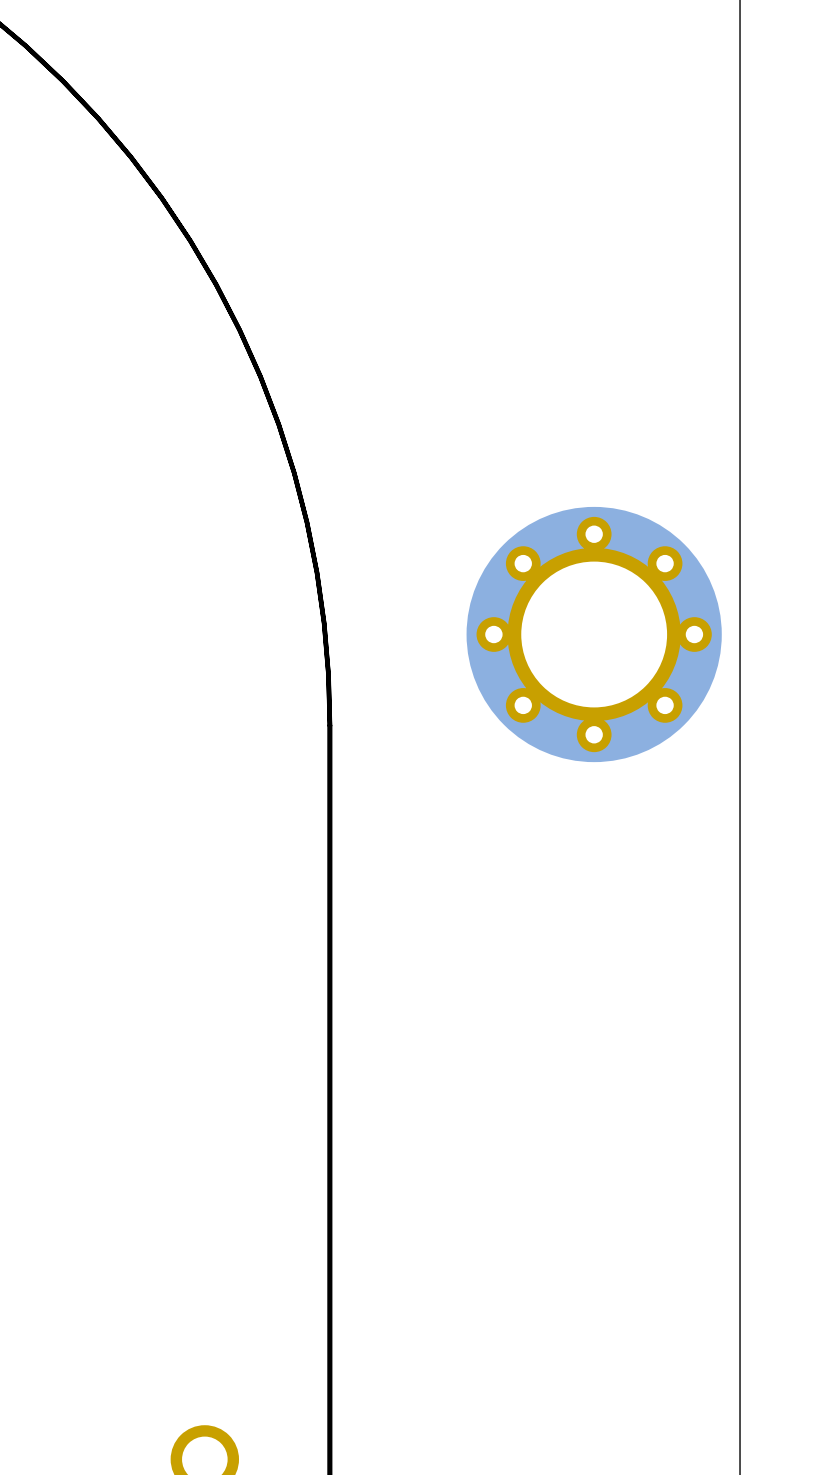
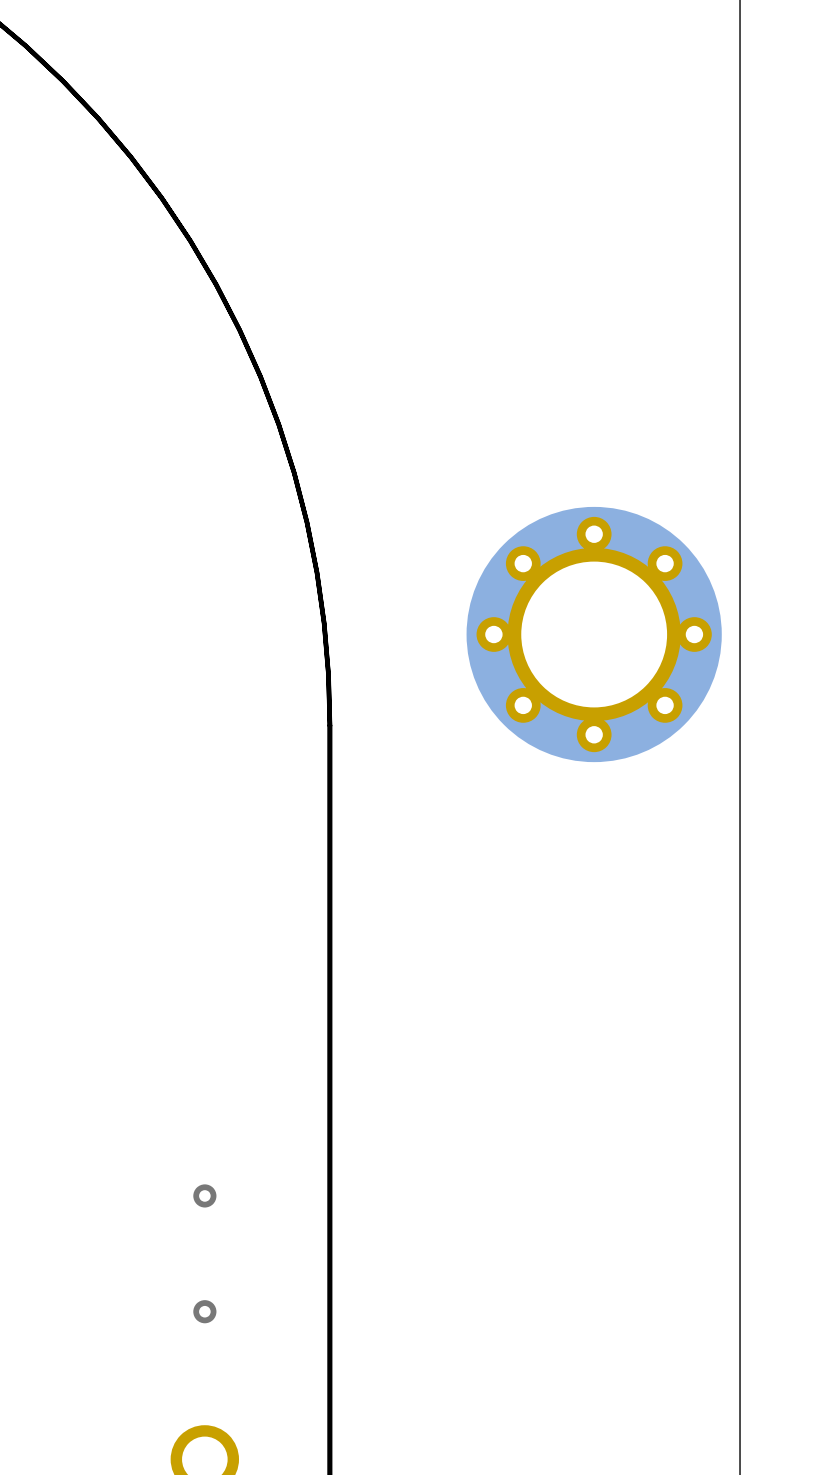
via: none -> (204, 1195)
via: none -> (204, 1311)

